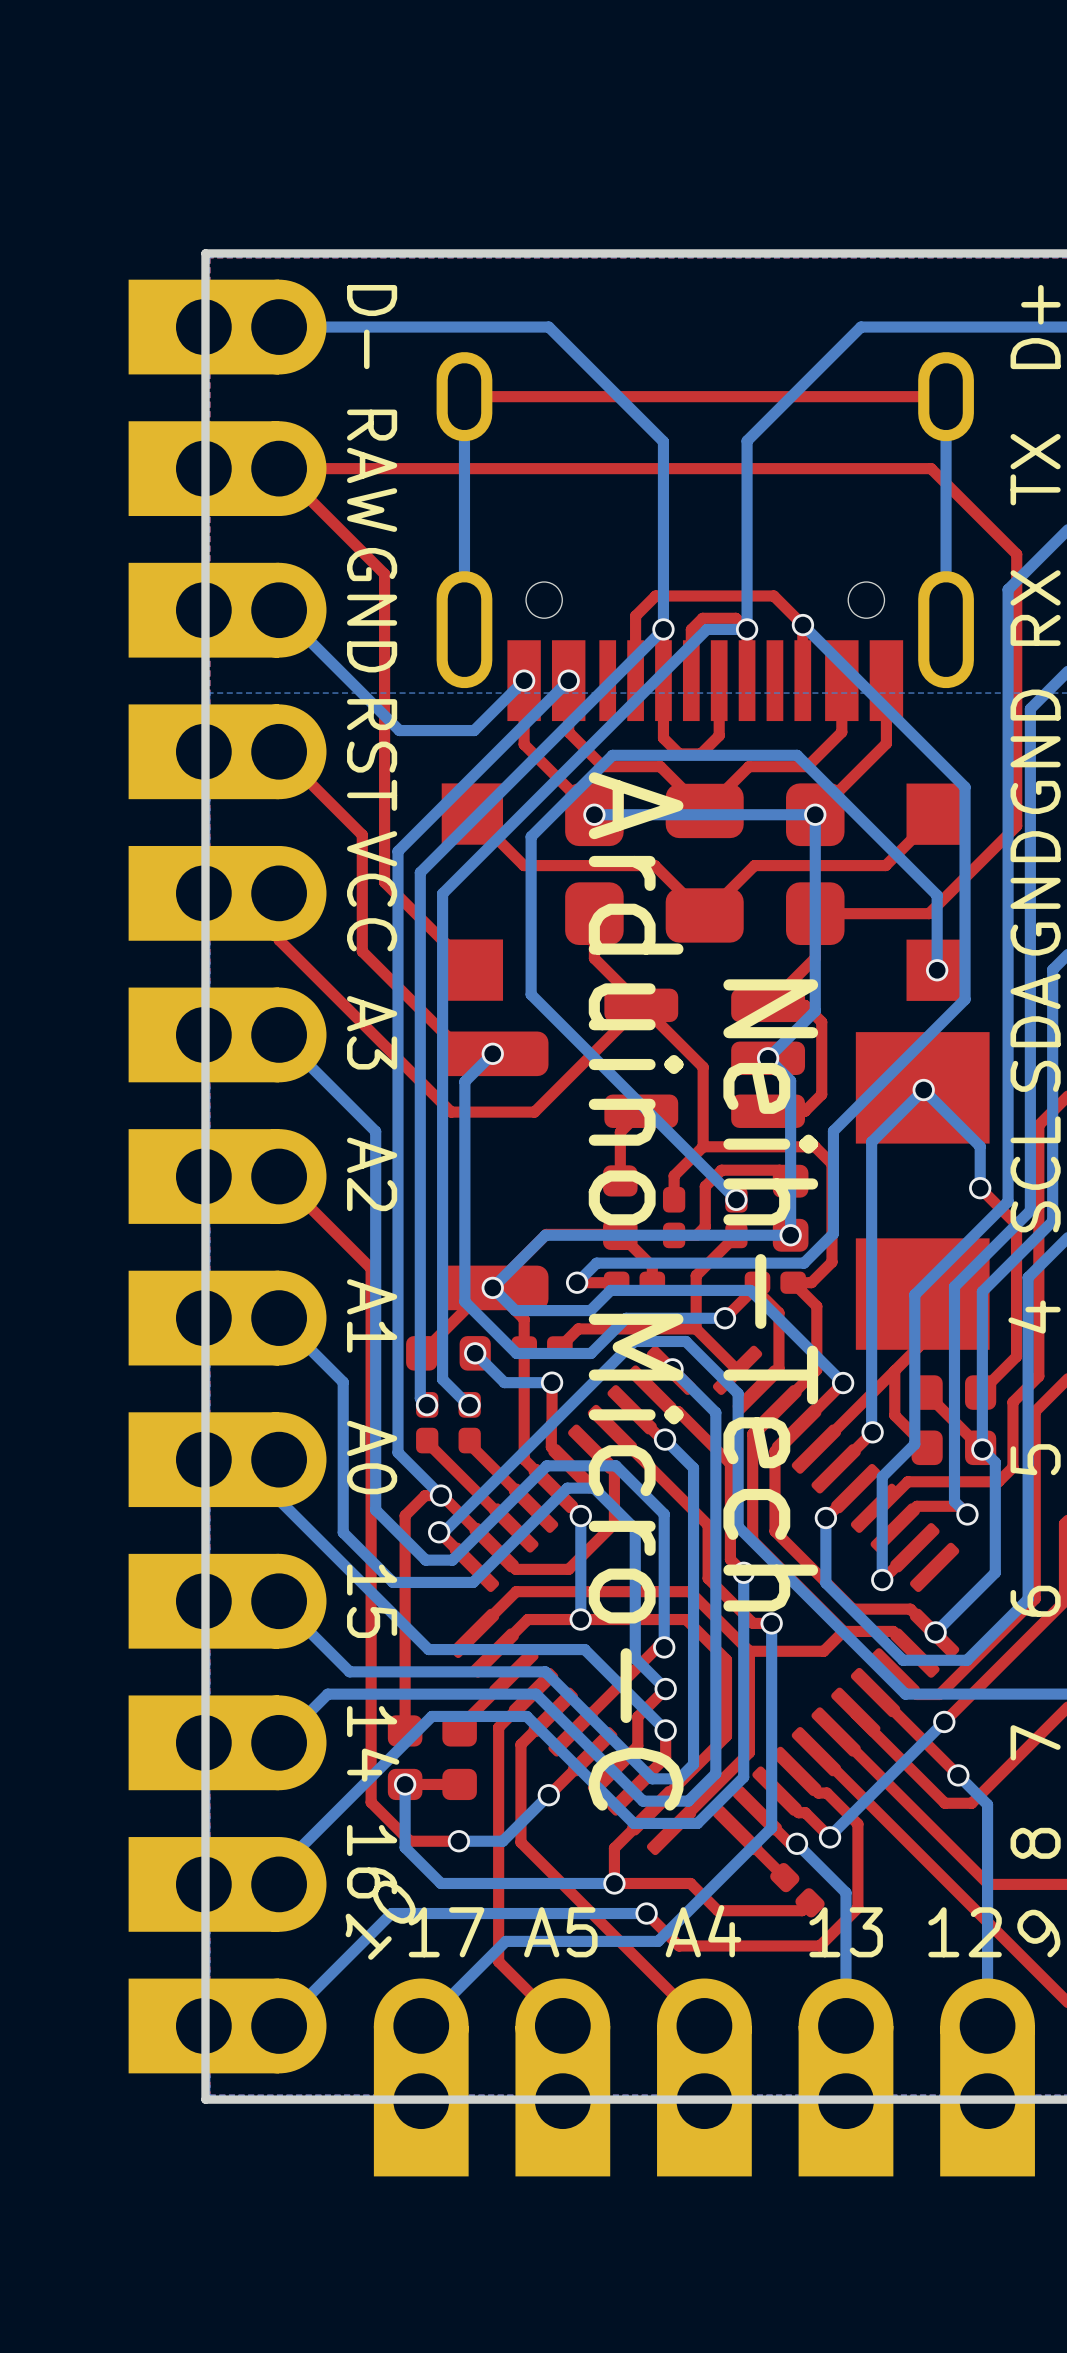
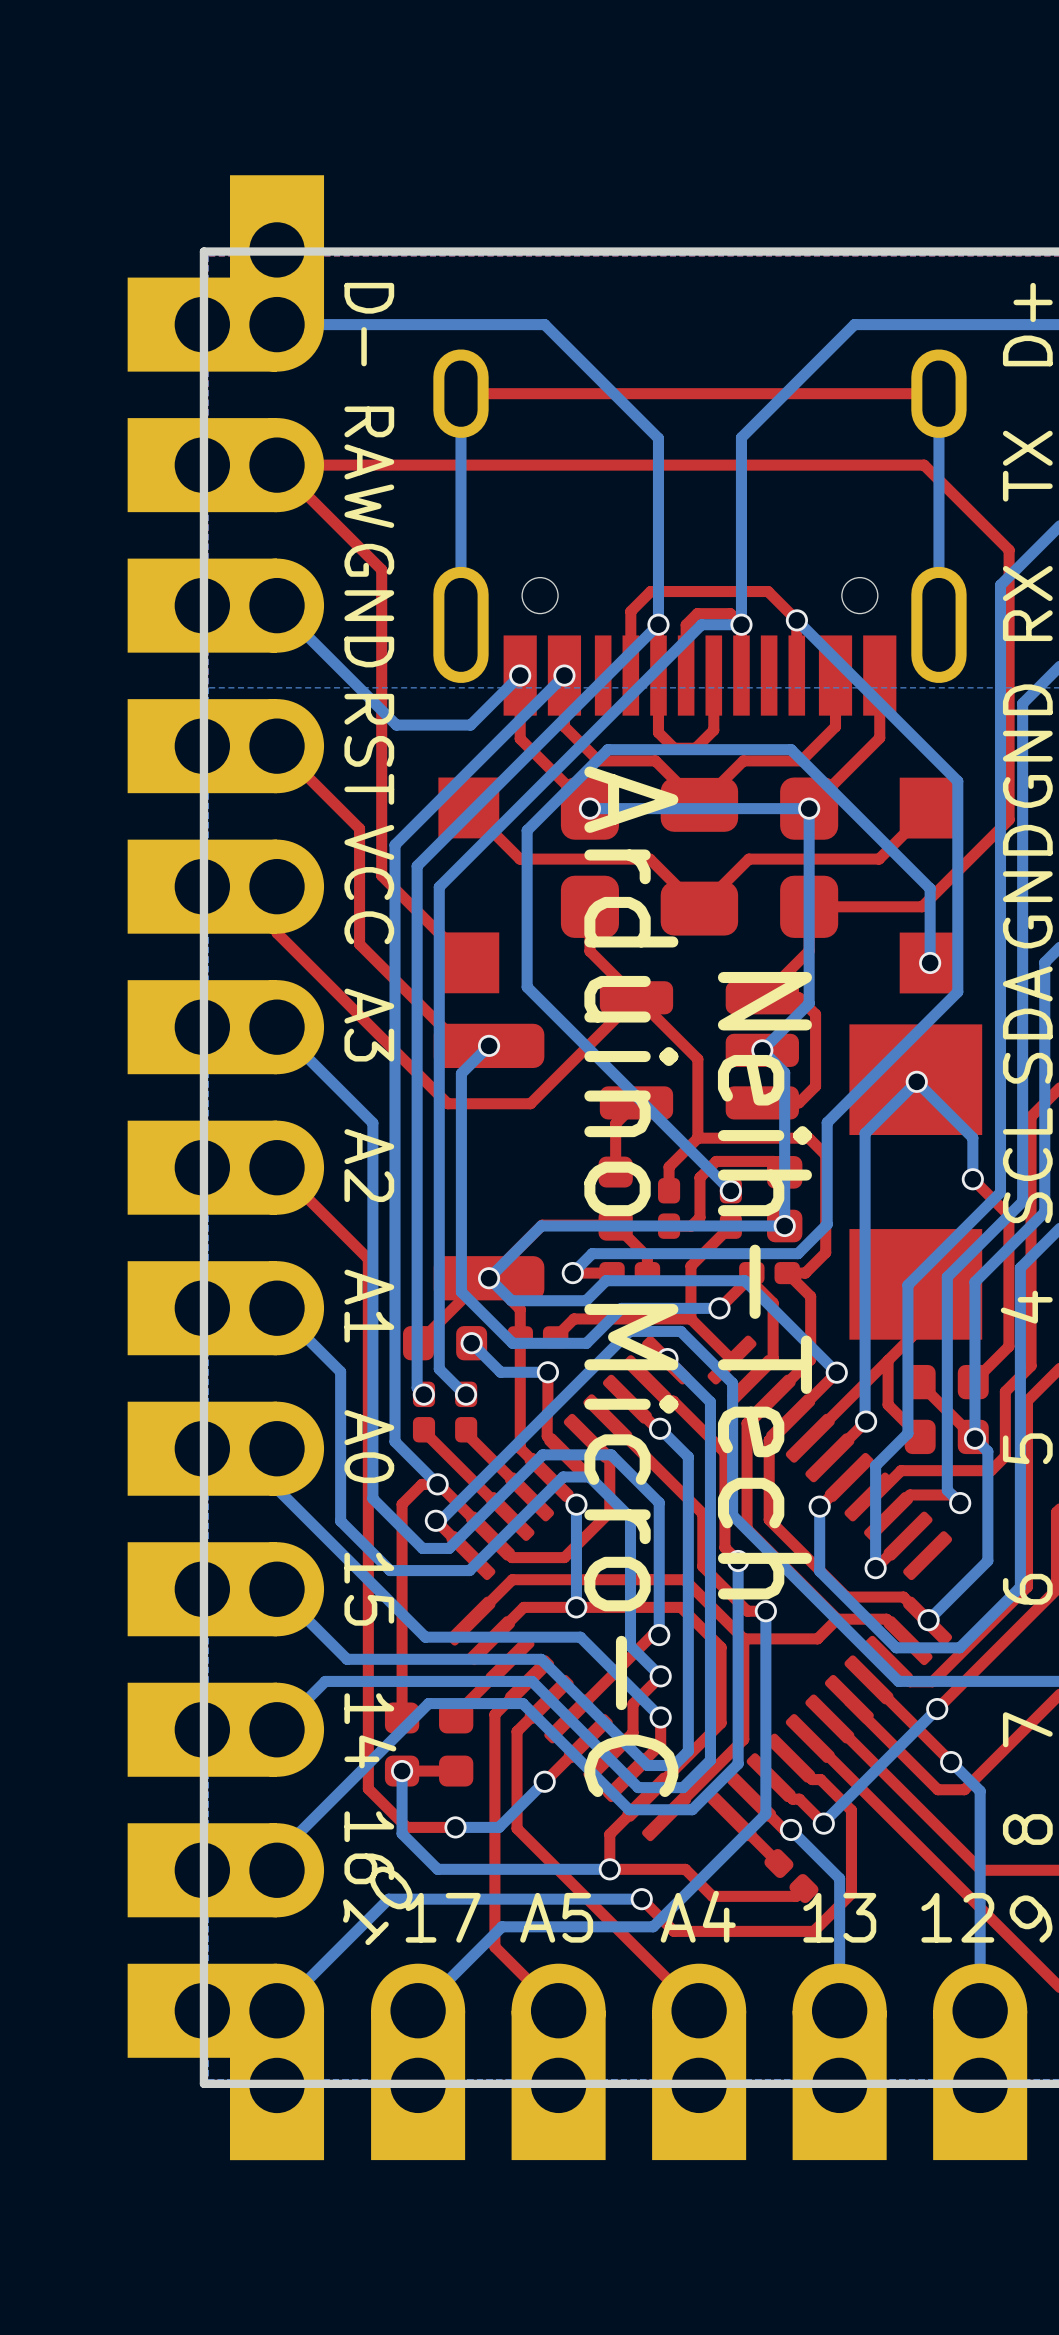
part footprint: [128, 279, 327, 2074] -> [127, 175, 325, 2161]

